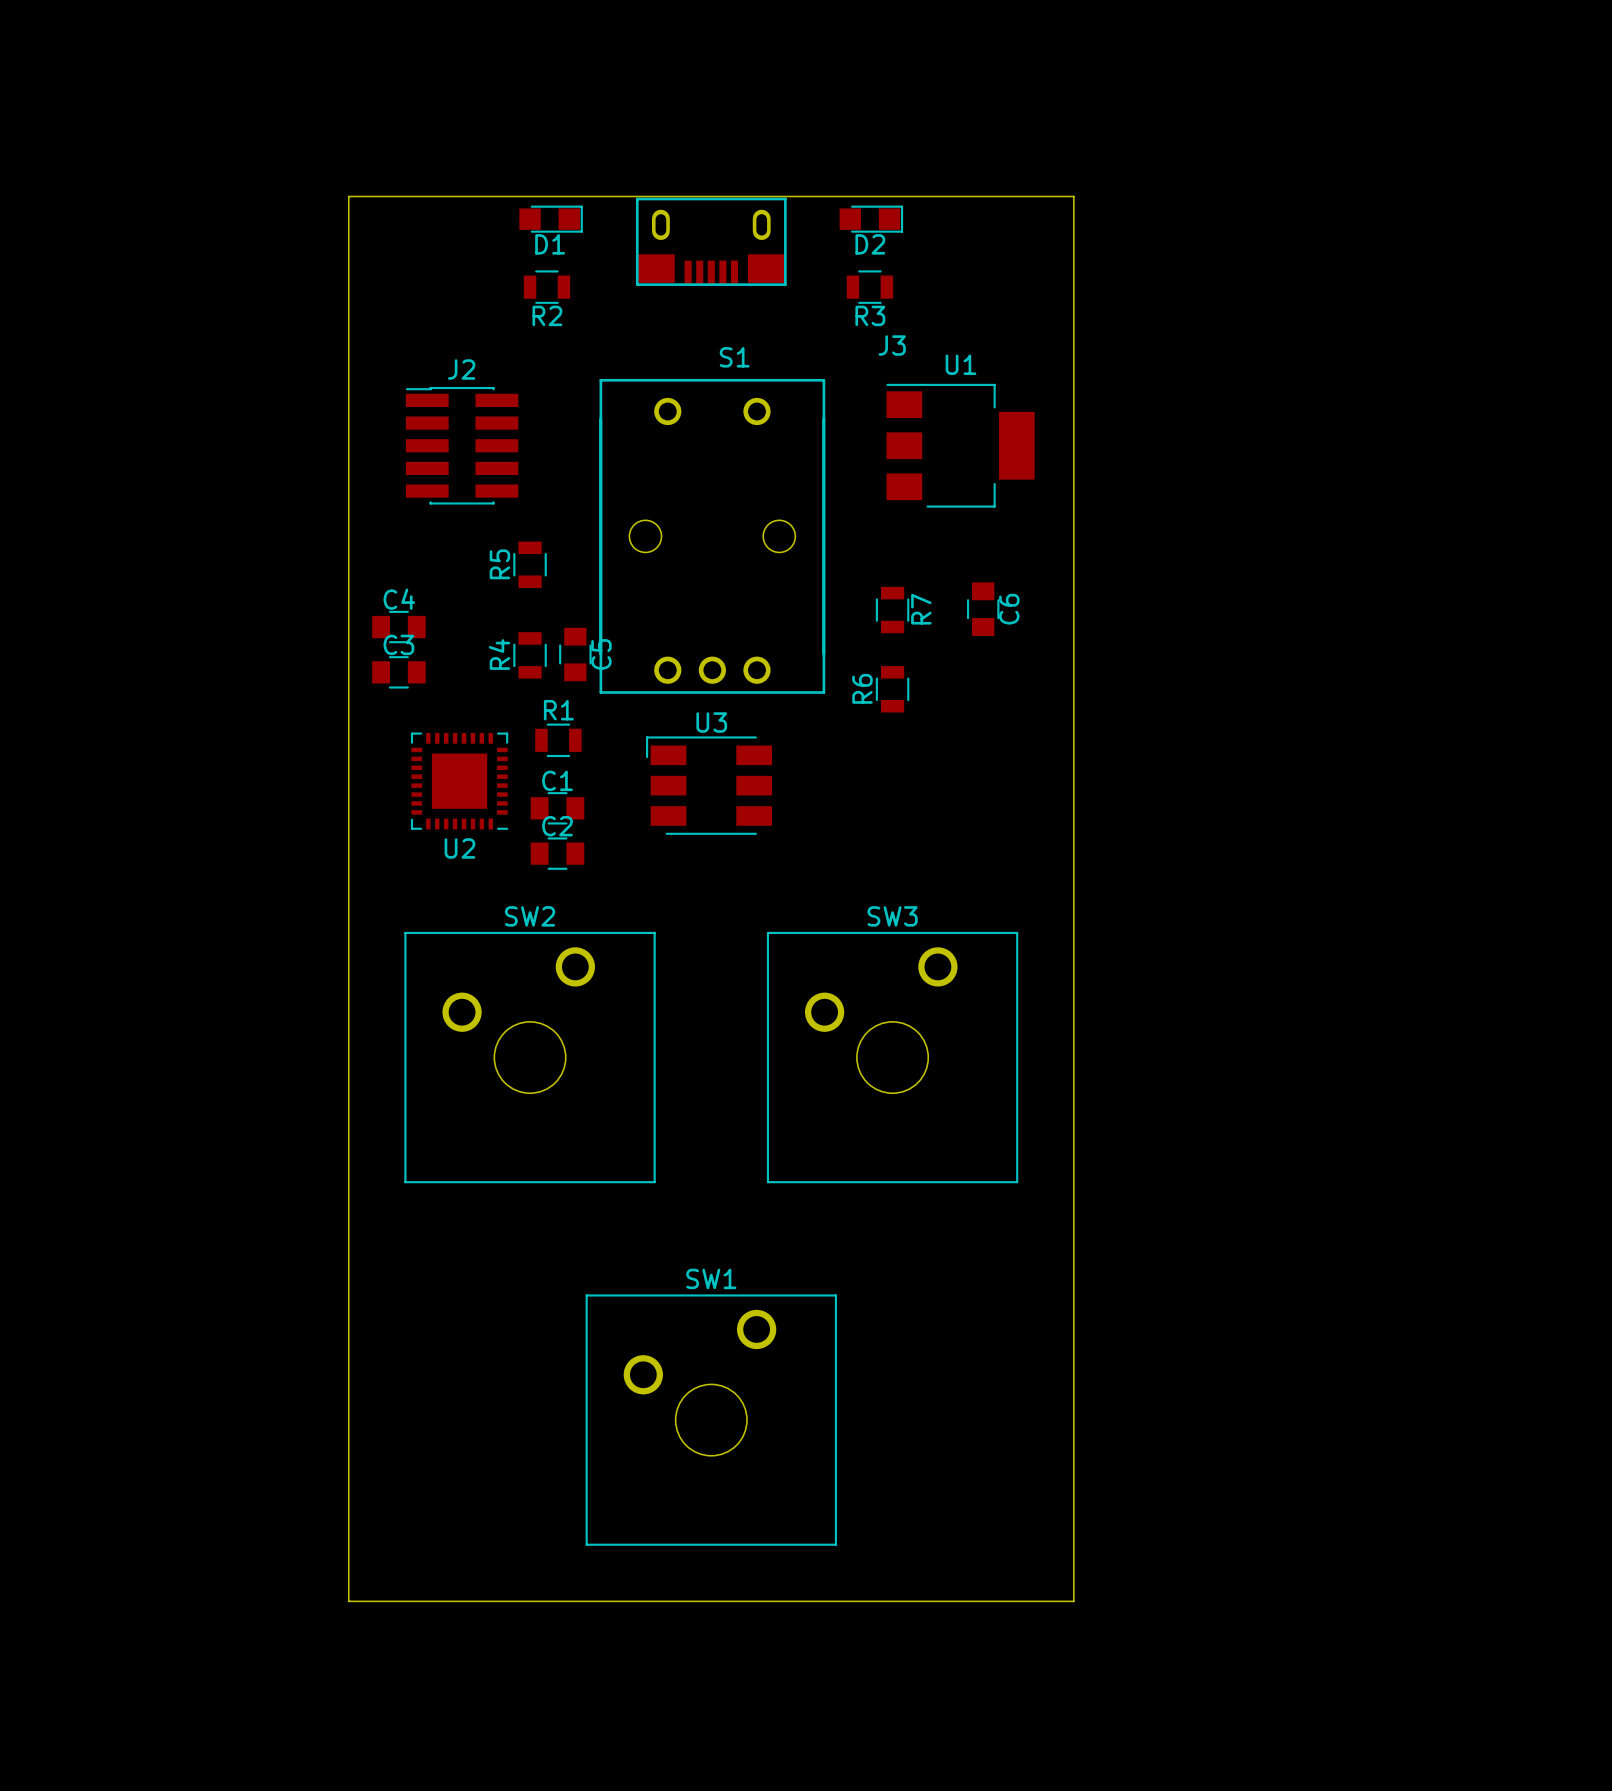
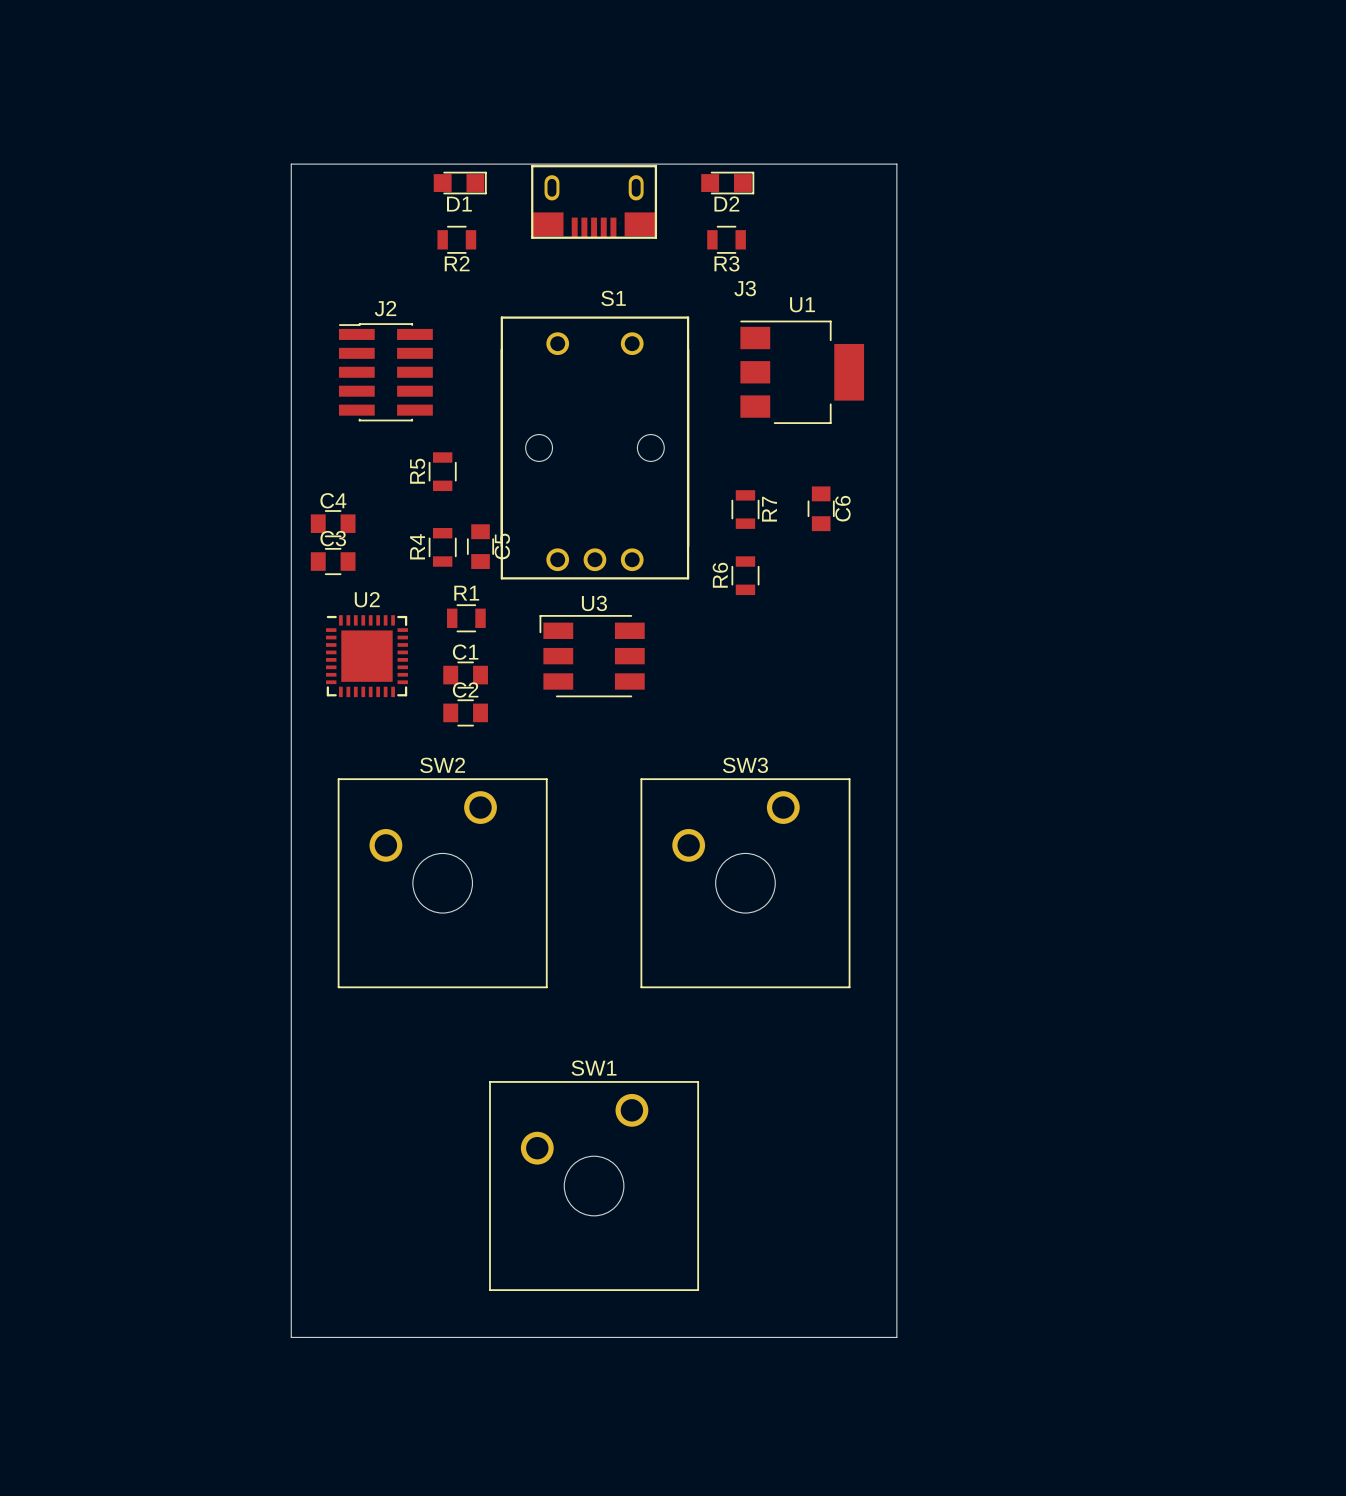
U2 footprint: [410, 732, 509, 830] -> [326, 615, 408, 698]
U2 name position: U2 (459, 848) -> U2 (367, 599)

